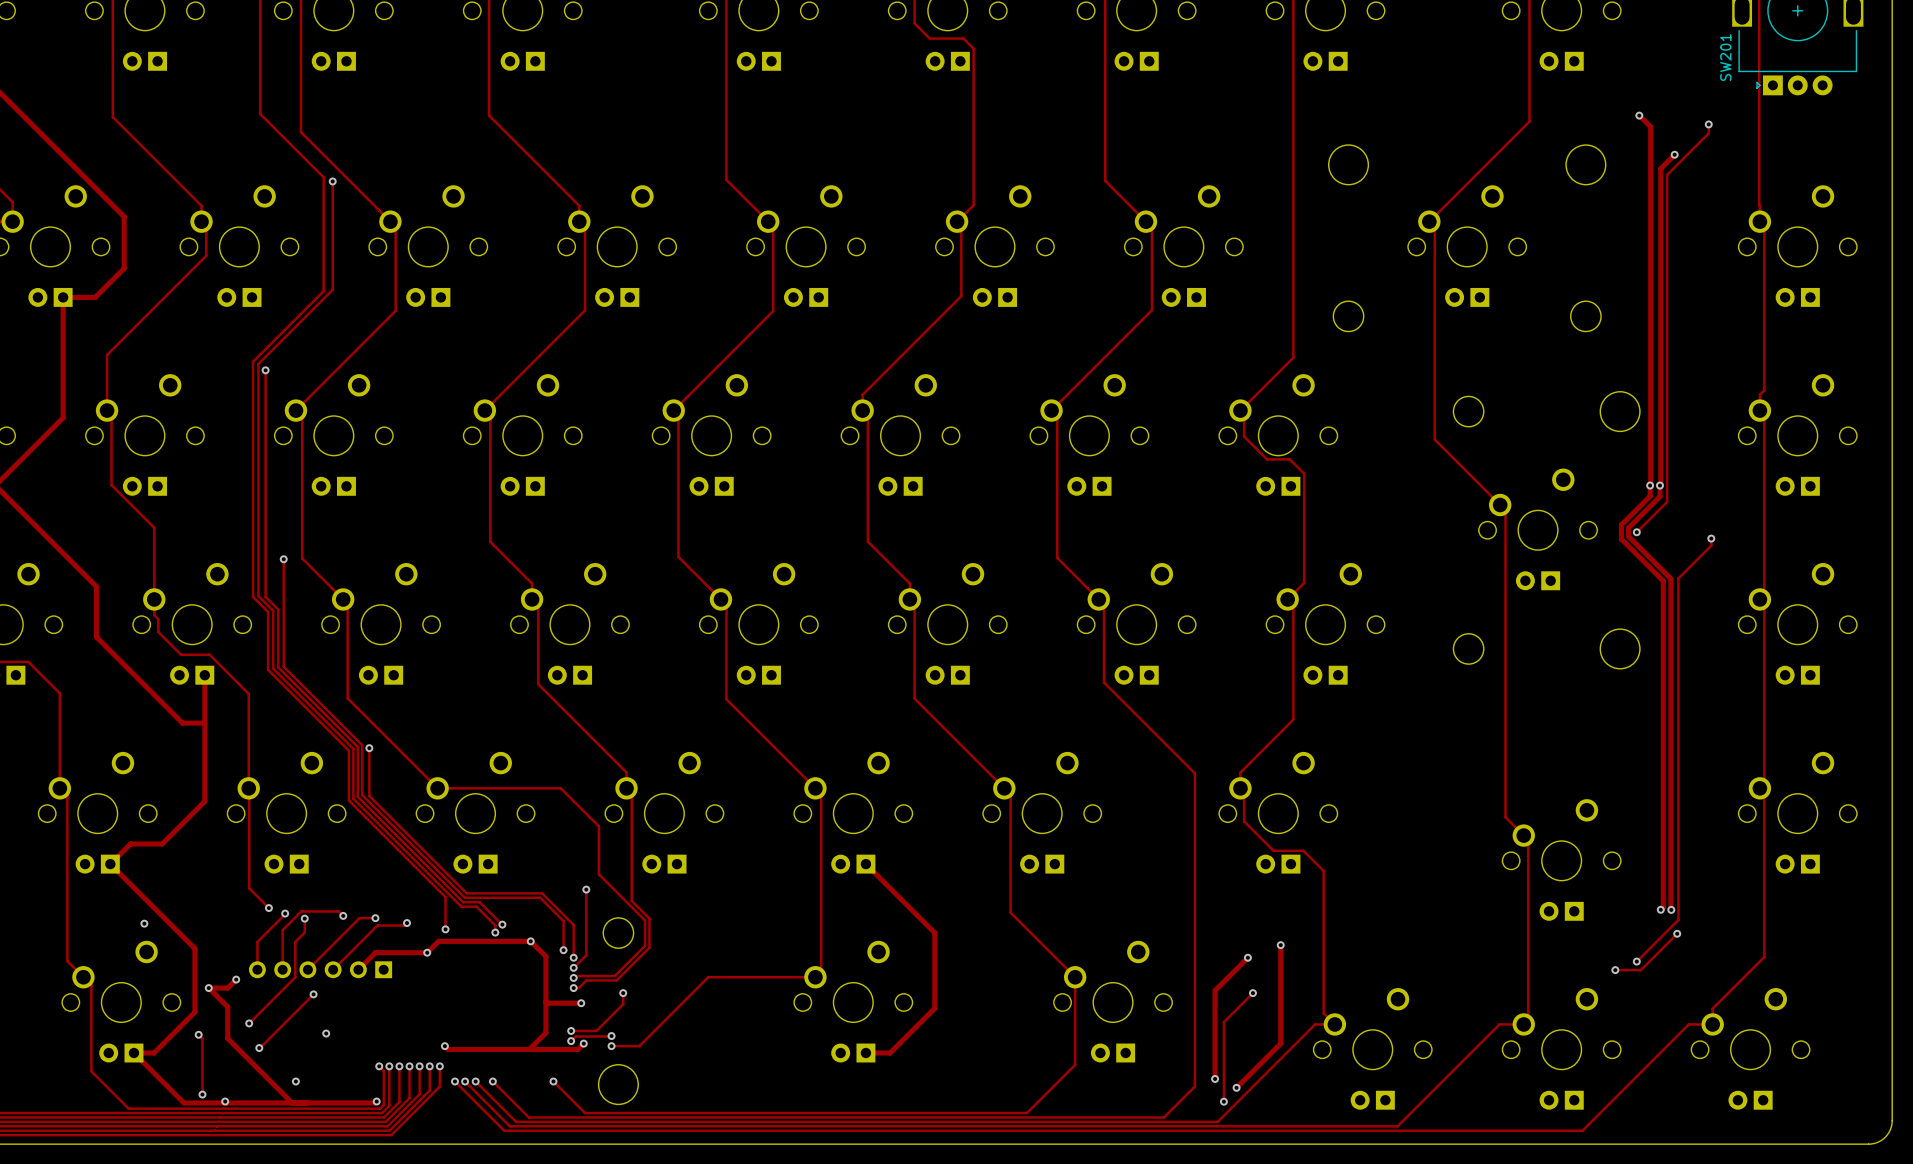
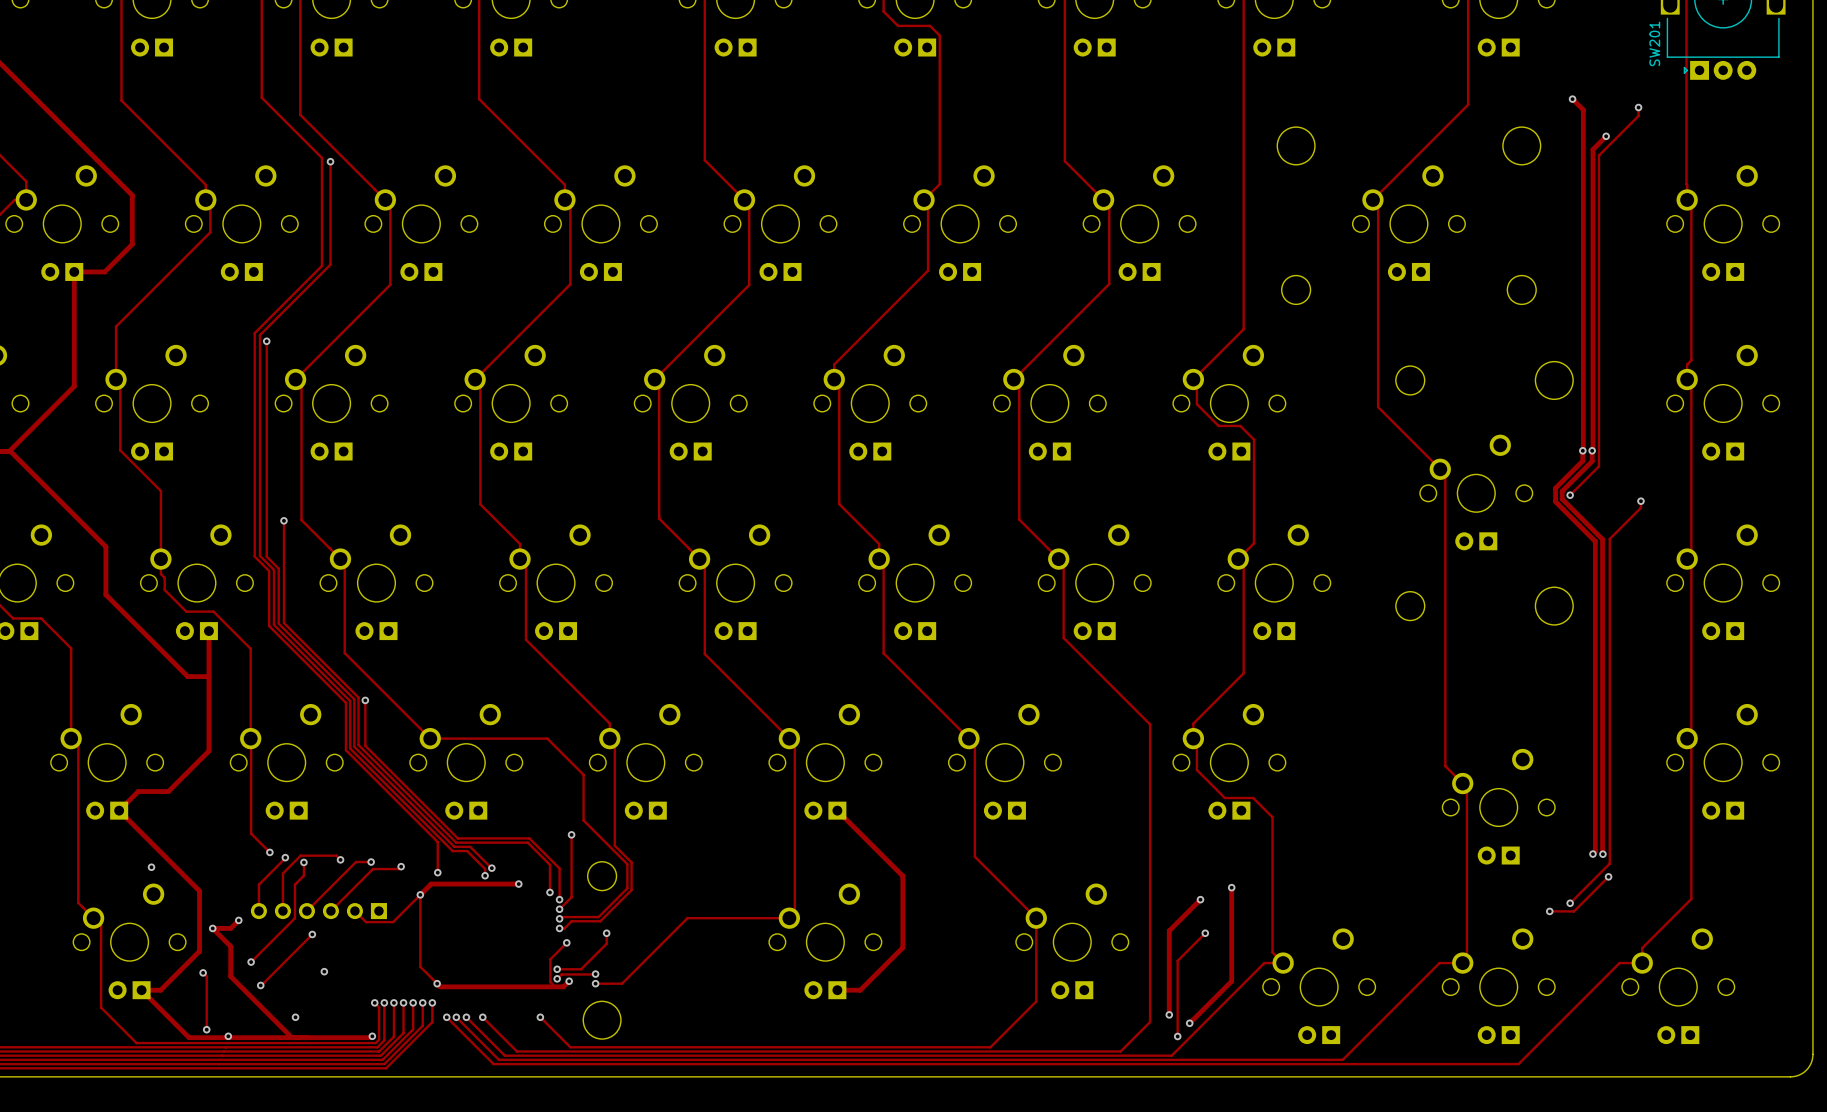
track: (530, 941) (545, 956) (545, 1032) (529, 1049) -> none
track: (427, 952) (375, 952) (358, 969) -> (437, 983) (420, 966) (420, 894) (393, 922) (365, 922) (354, 911)
track: (545, 1001) (581, 1003) -> (555, 987) (550, 982) (550, 959) (566, 942)

